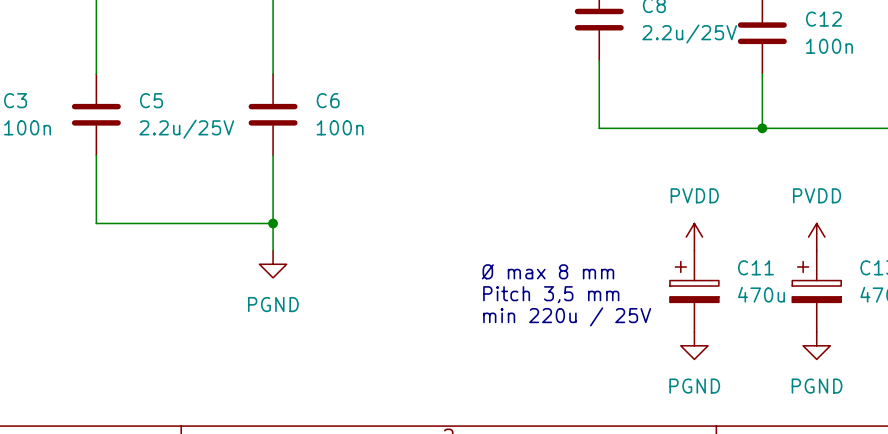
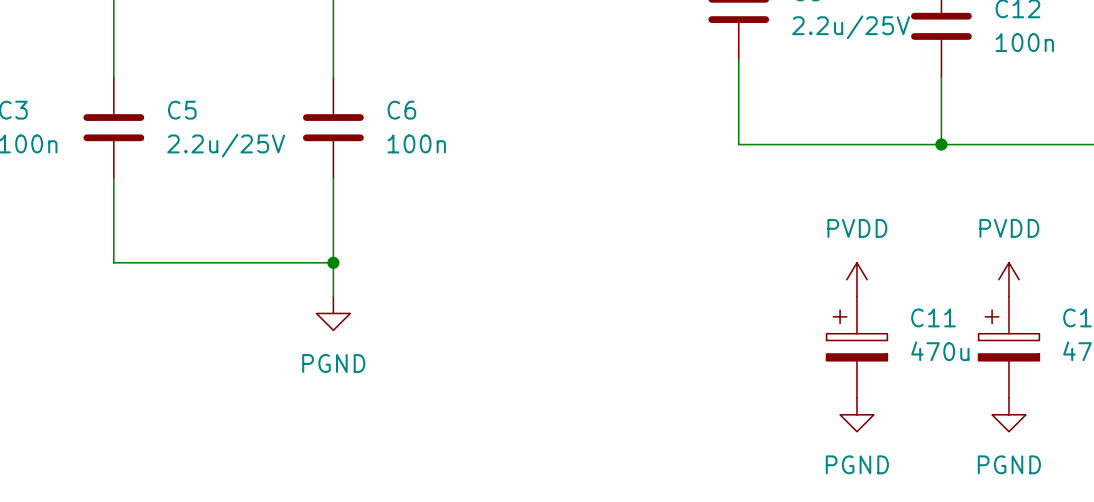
text: Ø max 8 mm (548, 271) -> none
text: Pitch 3,5 mm (551, 294) -> none
text: min 220u / 25V (567, 316) -> none

